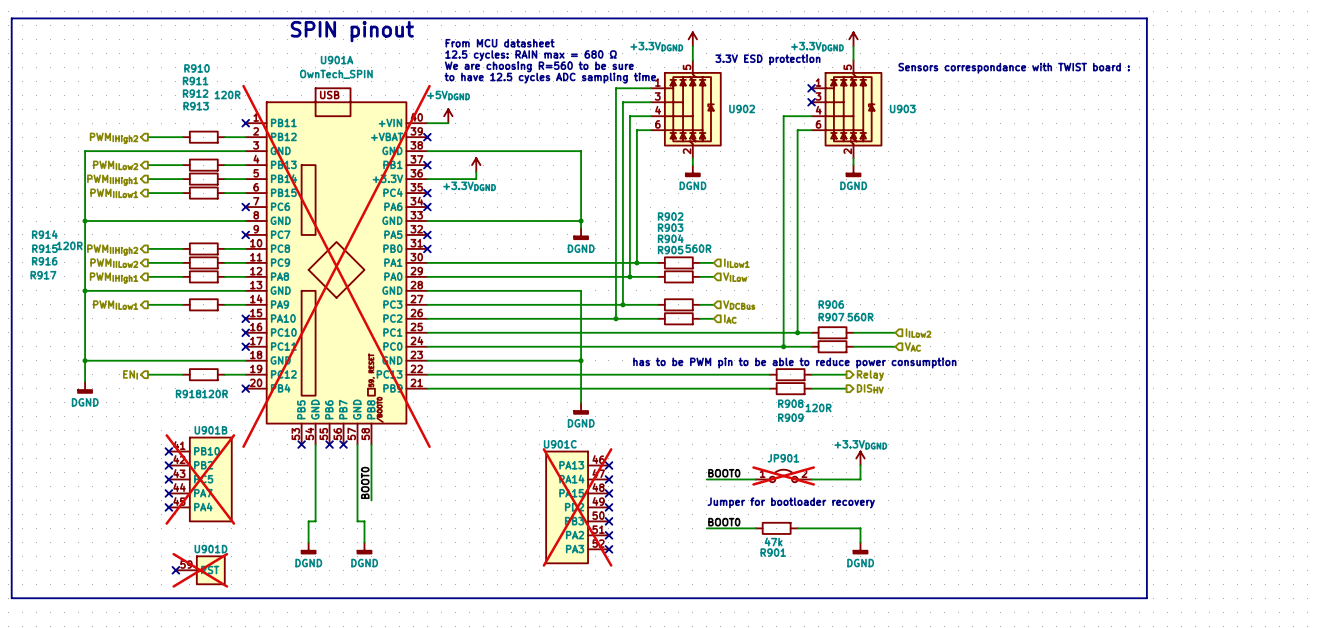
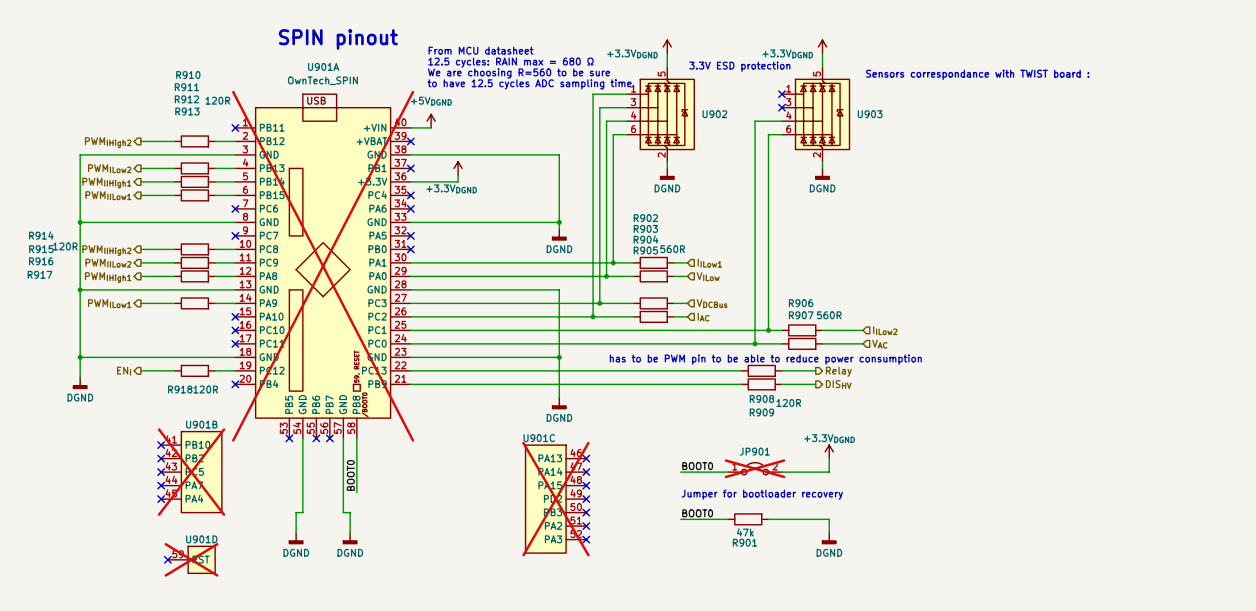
line: (11, 18) (1146, 18) (1146, 598) (11, 598) (11, 18) -> none

